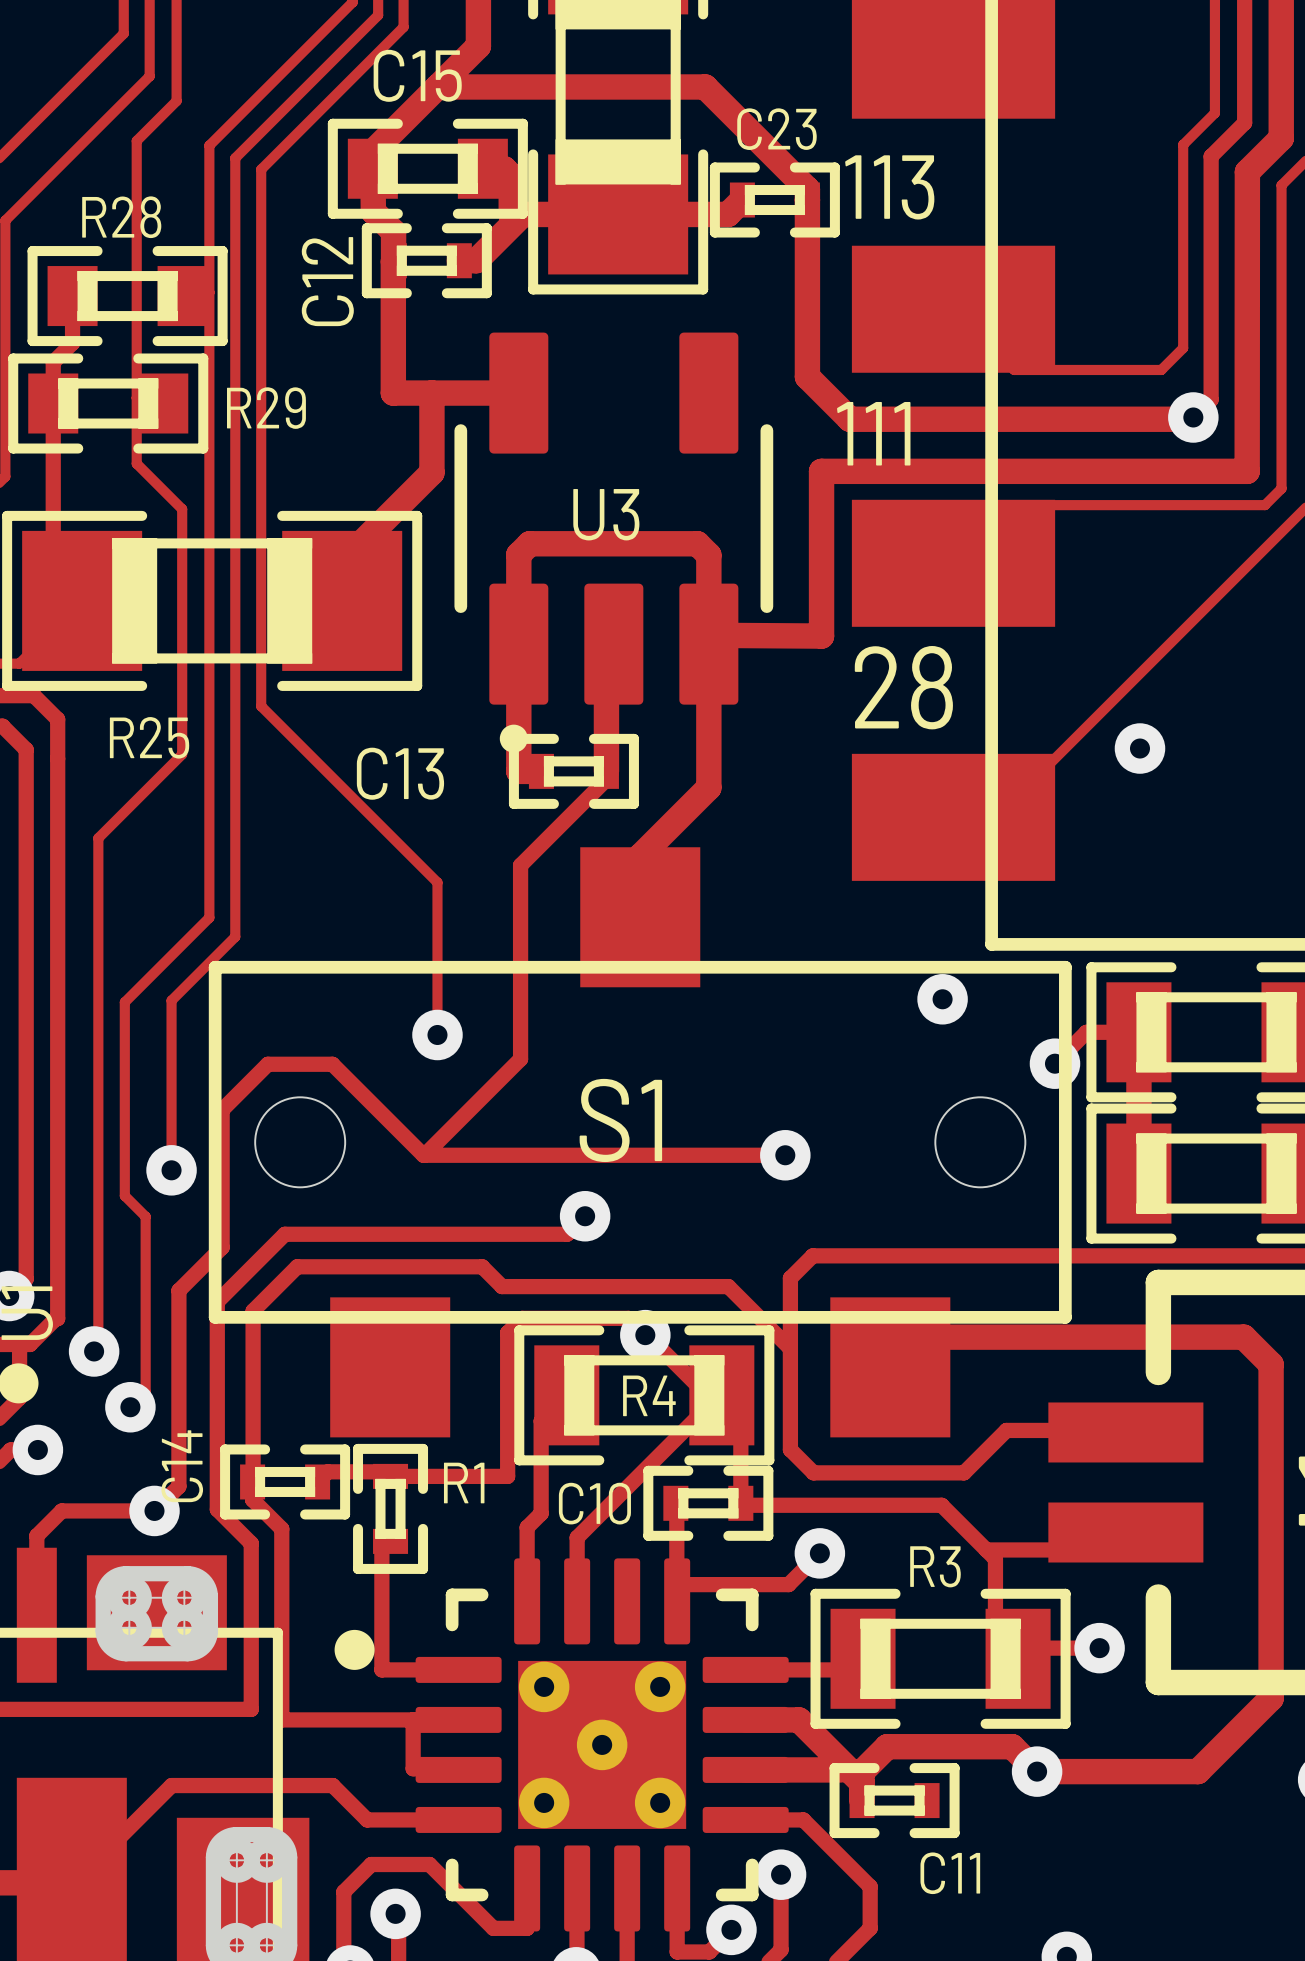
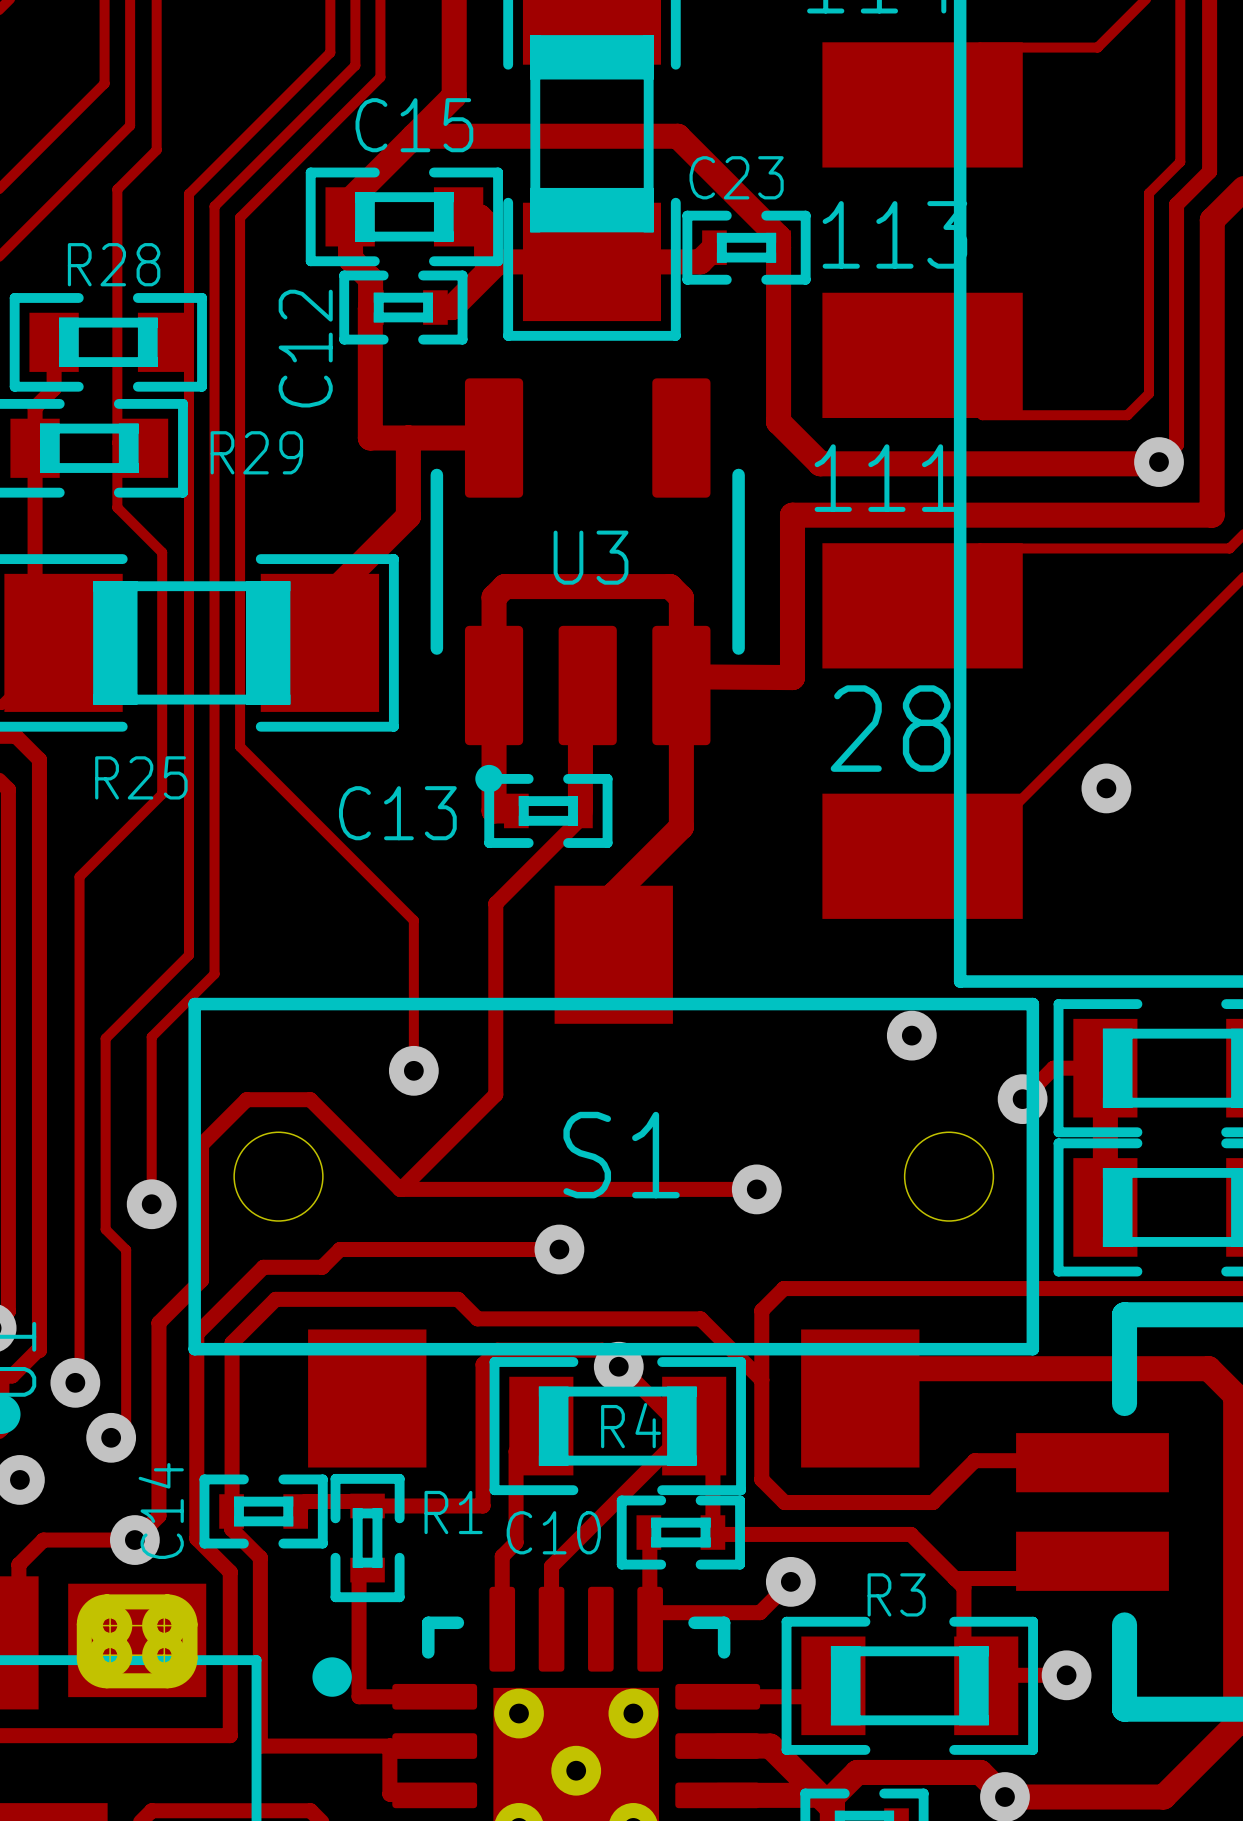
track: (585, 1216) (567, 1234) (344, 1234) -> (559, 1249) (340, 1249) (322, 1267)

